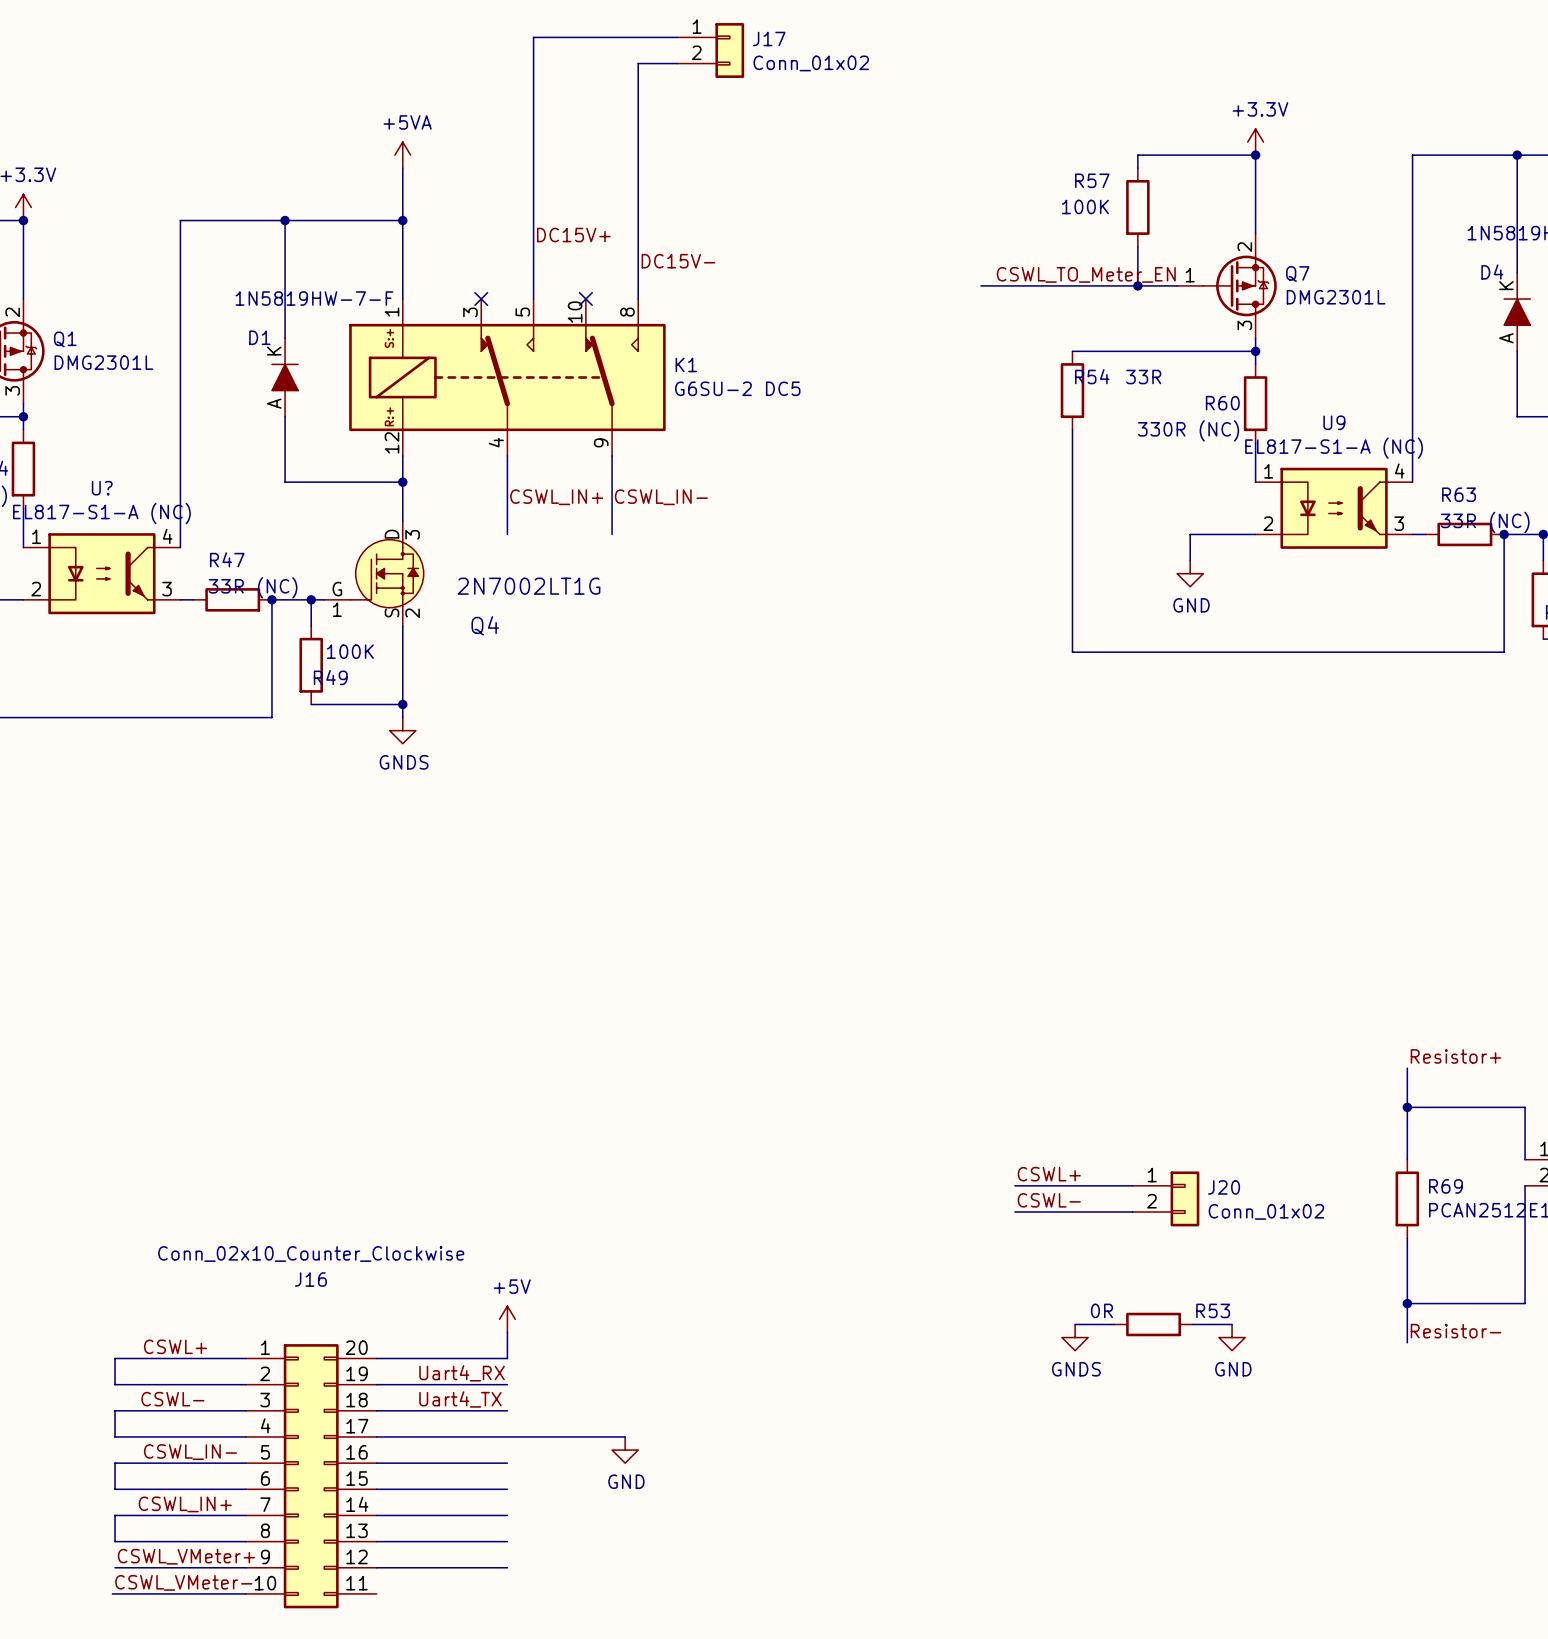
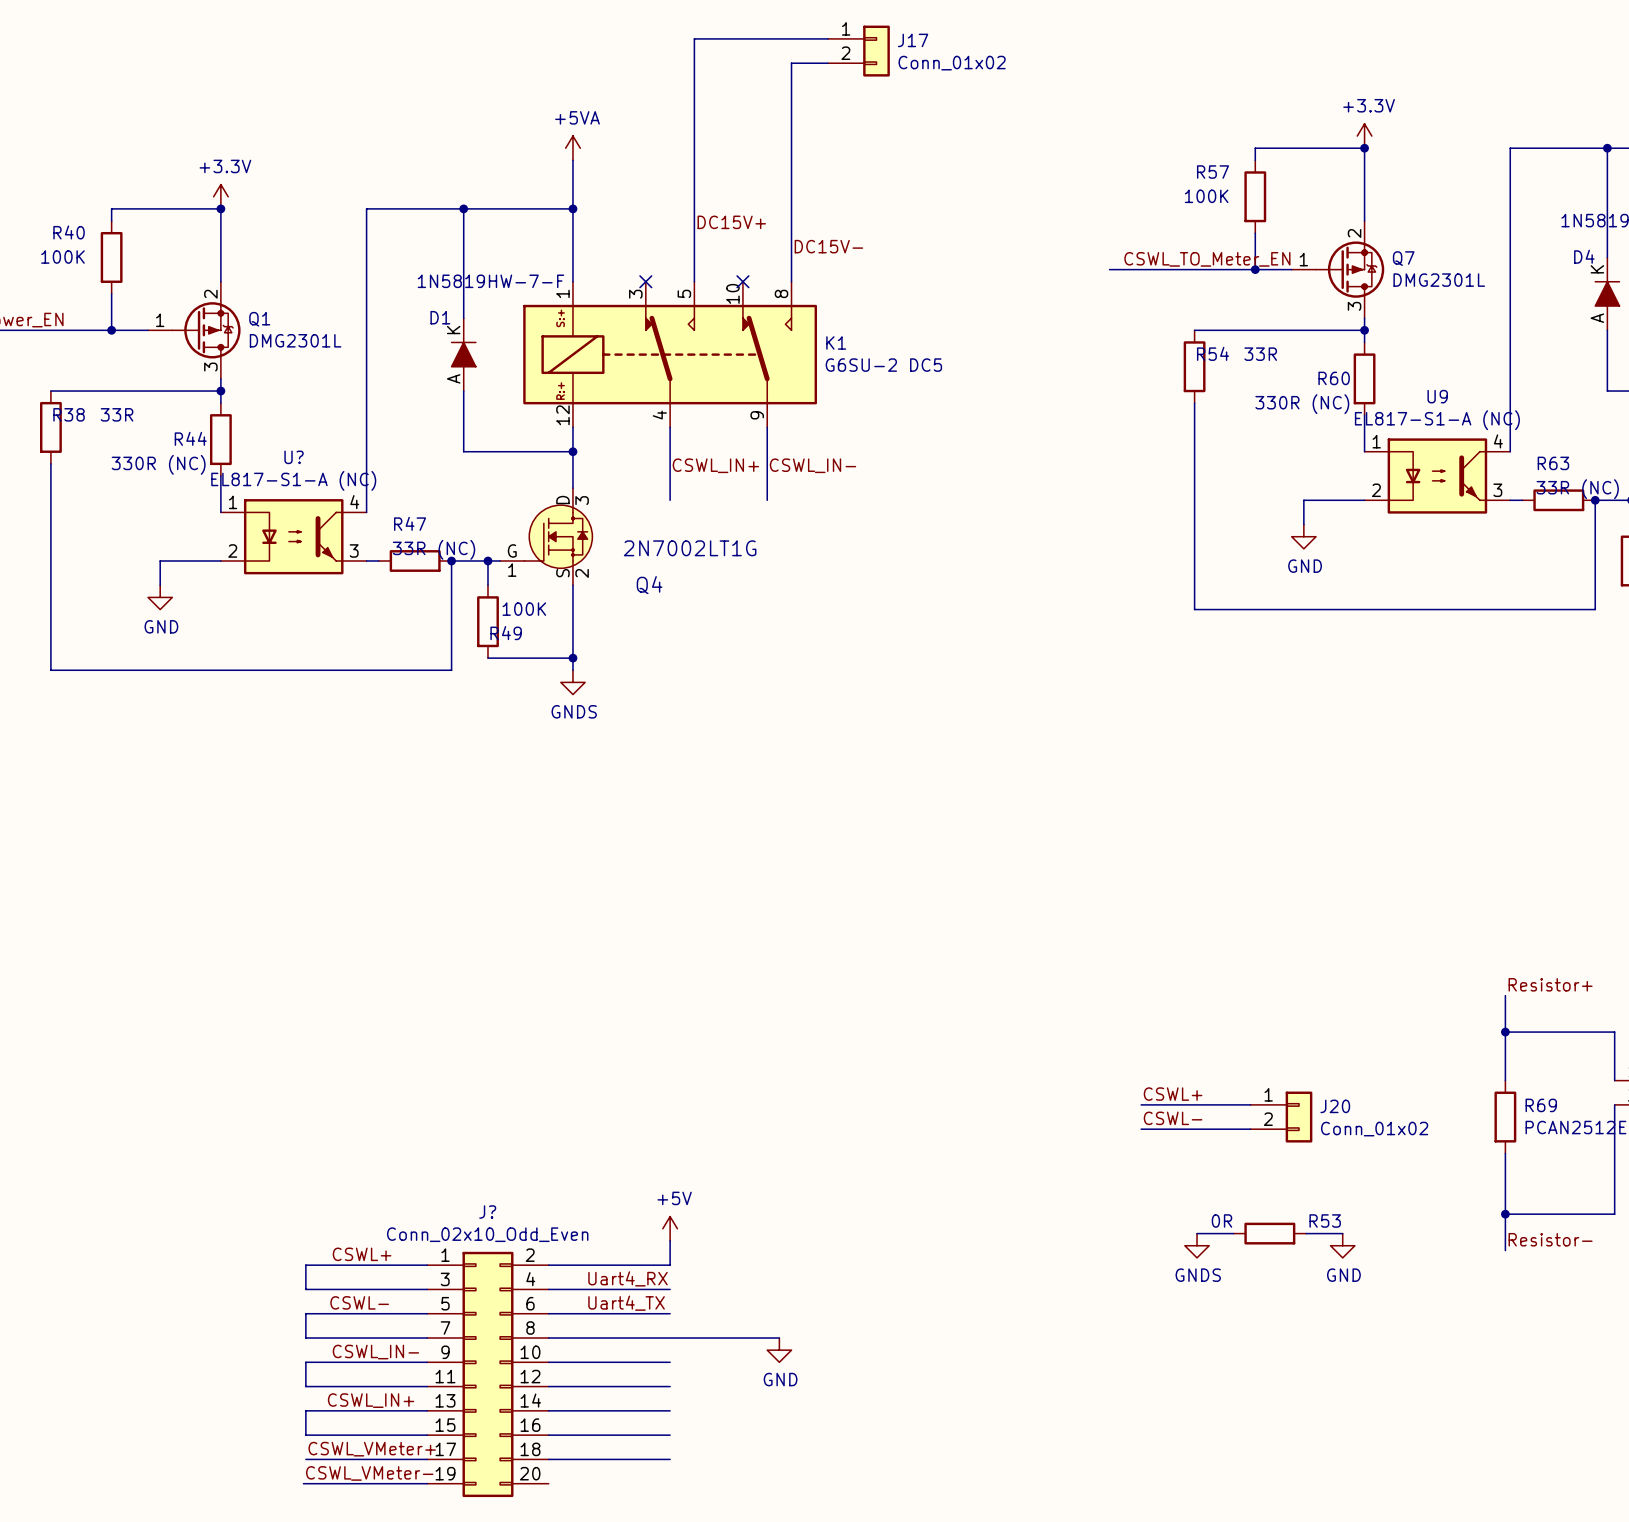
J16 value: Conn_02x10_Counter_Clockwise (311, 1253) -> Conn_02x10_Odd_Even (487, 1234)
J16 name: J16 (310, 1279) -> J? (487, 1212)
J16 symbol: [245, 1344, 377, 1609] -> [427, 1251, 549, 1498]

